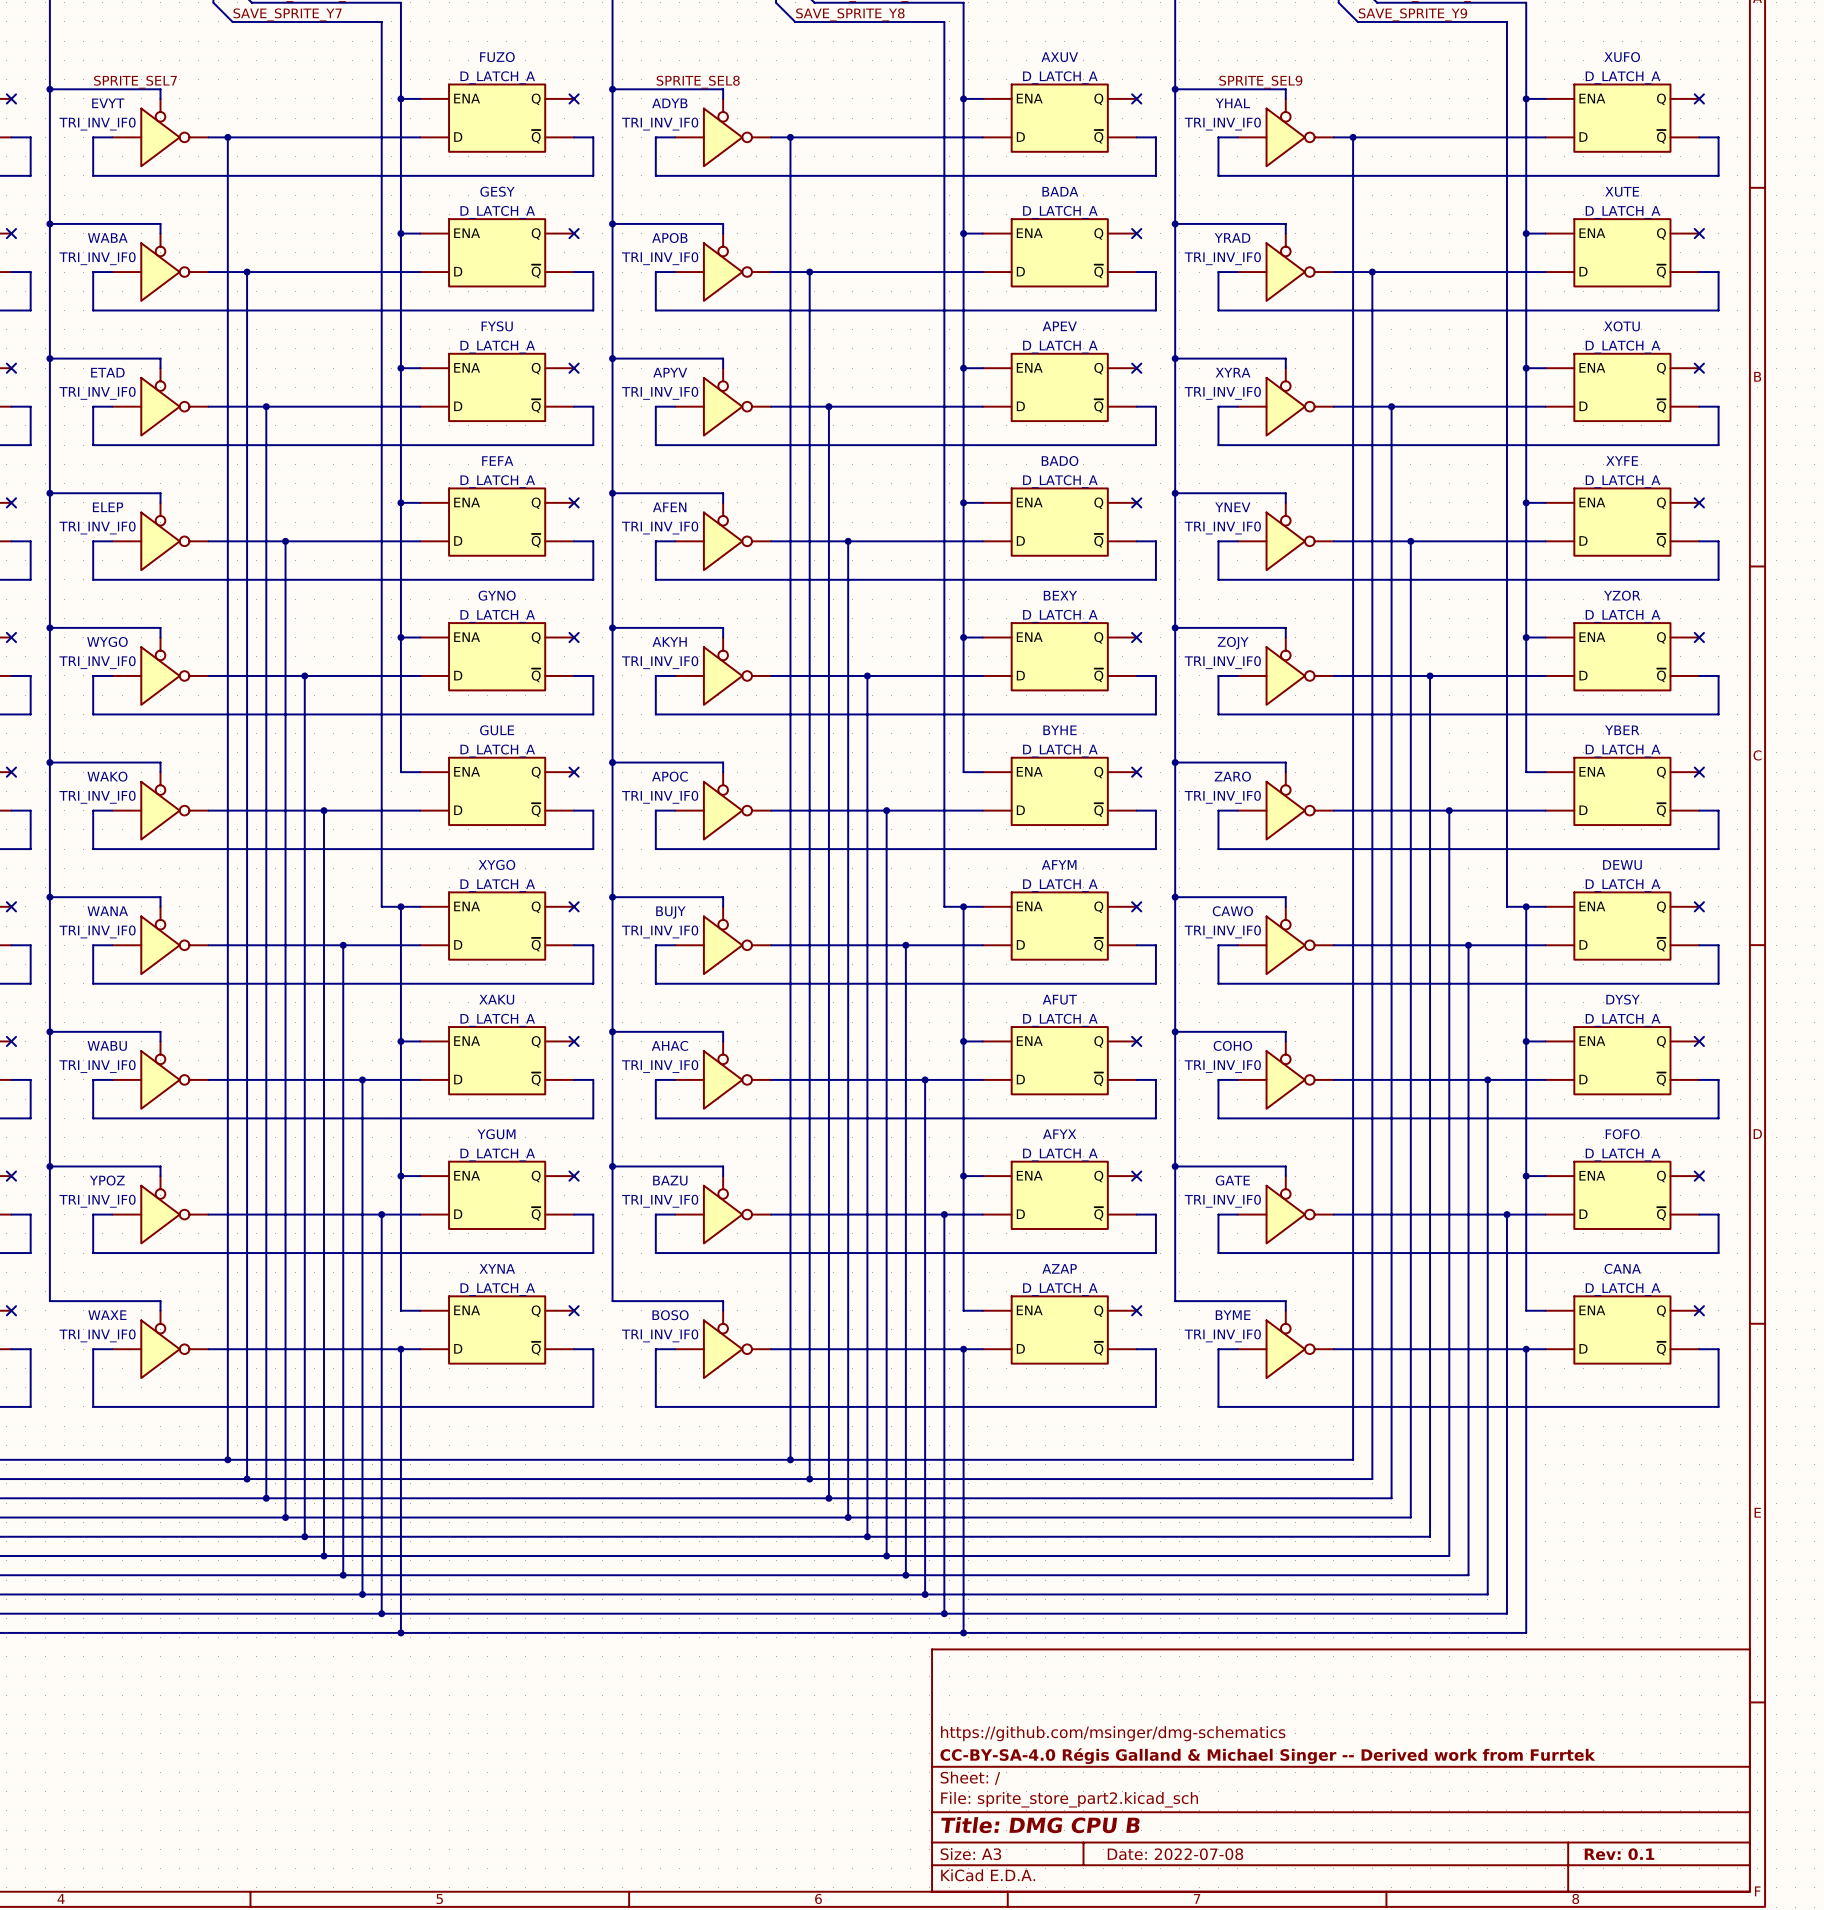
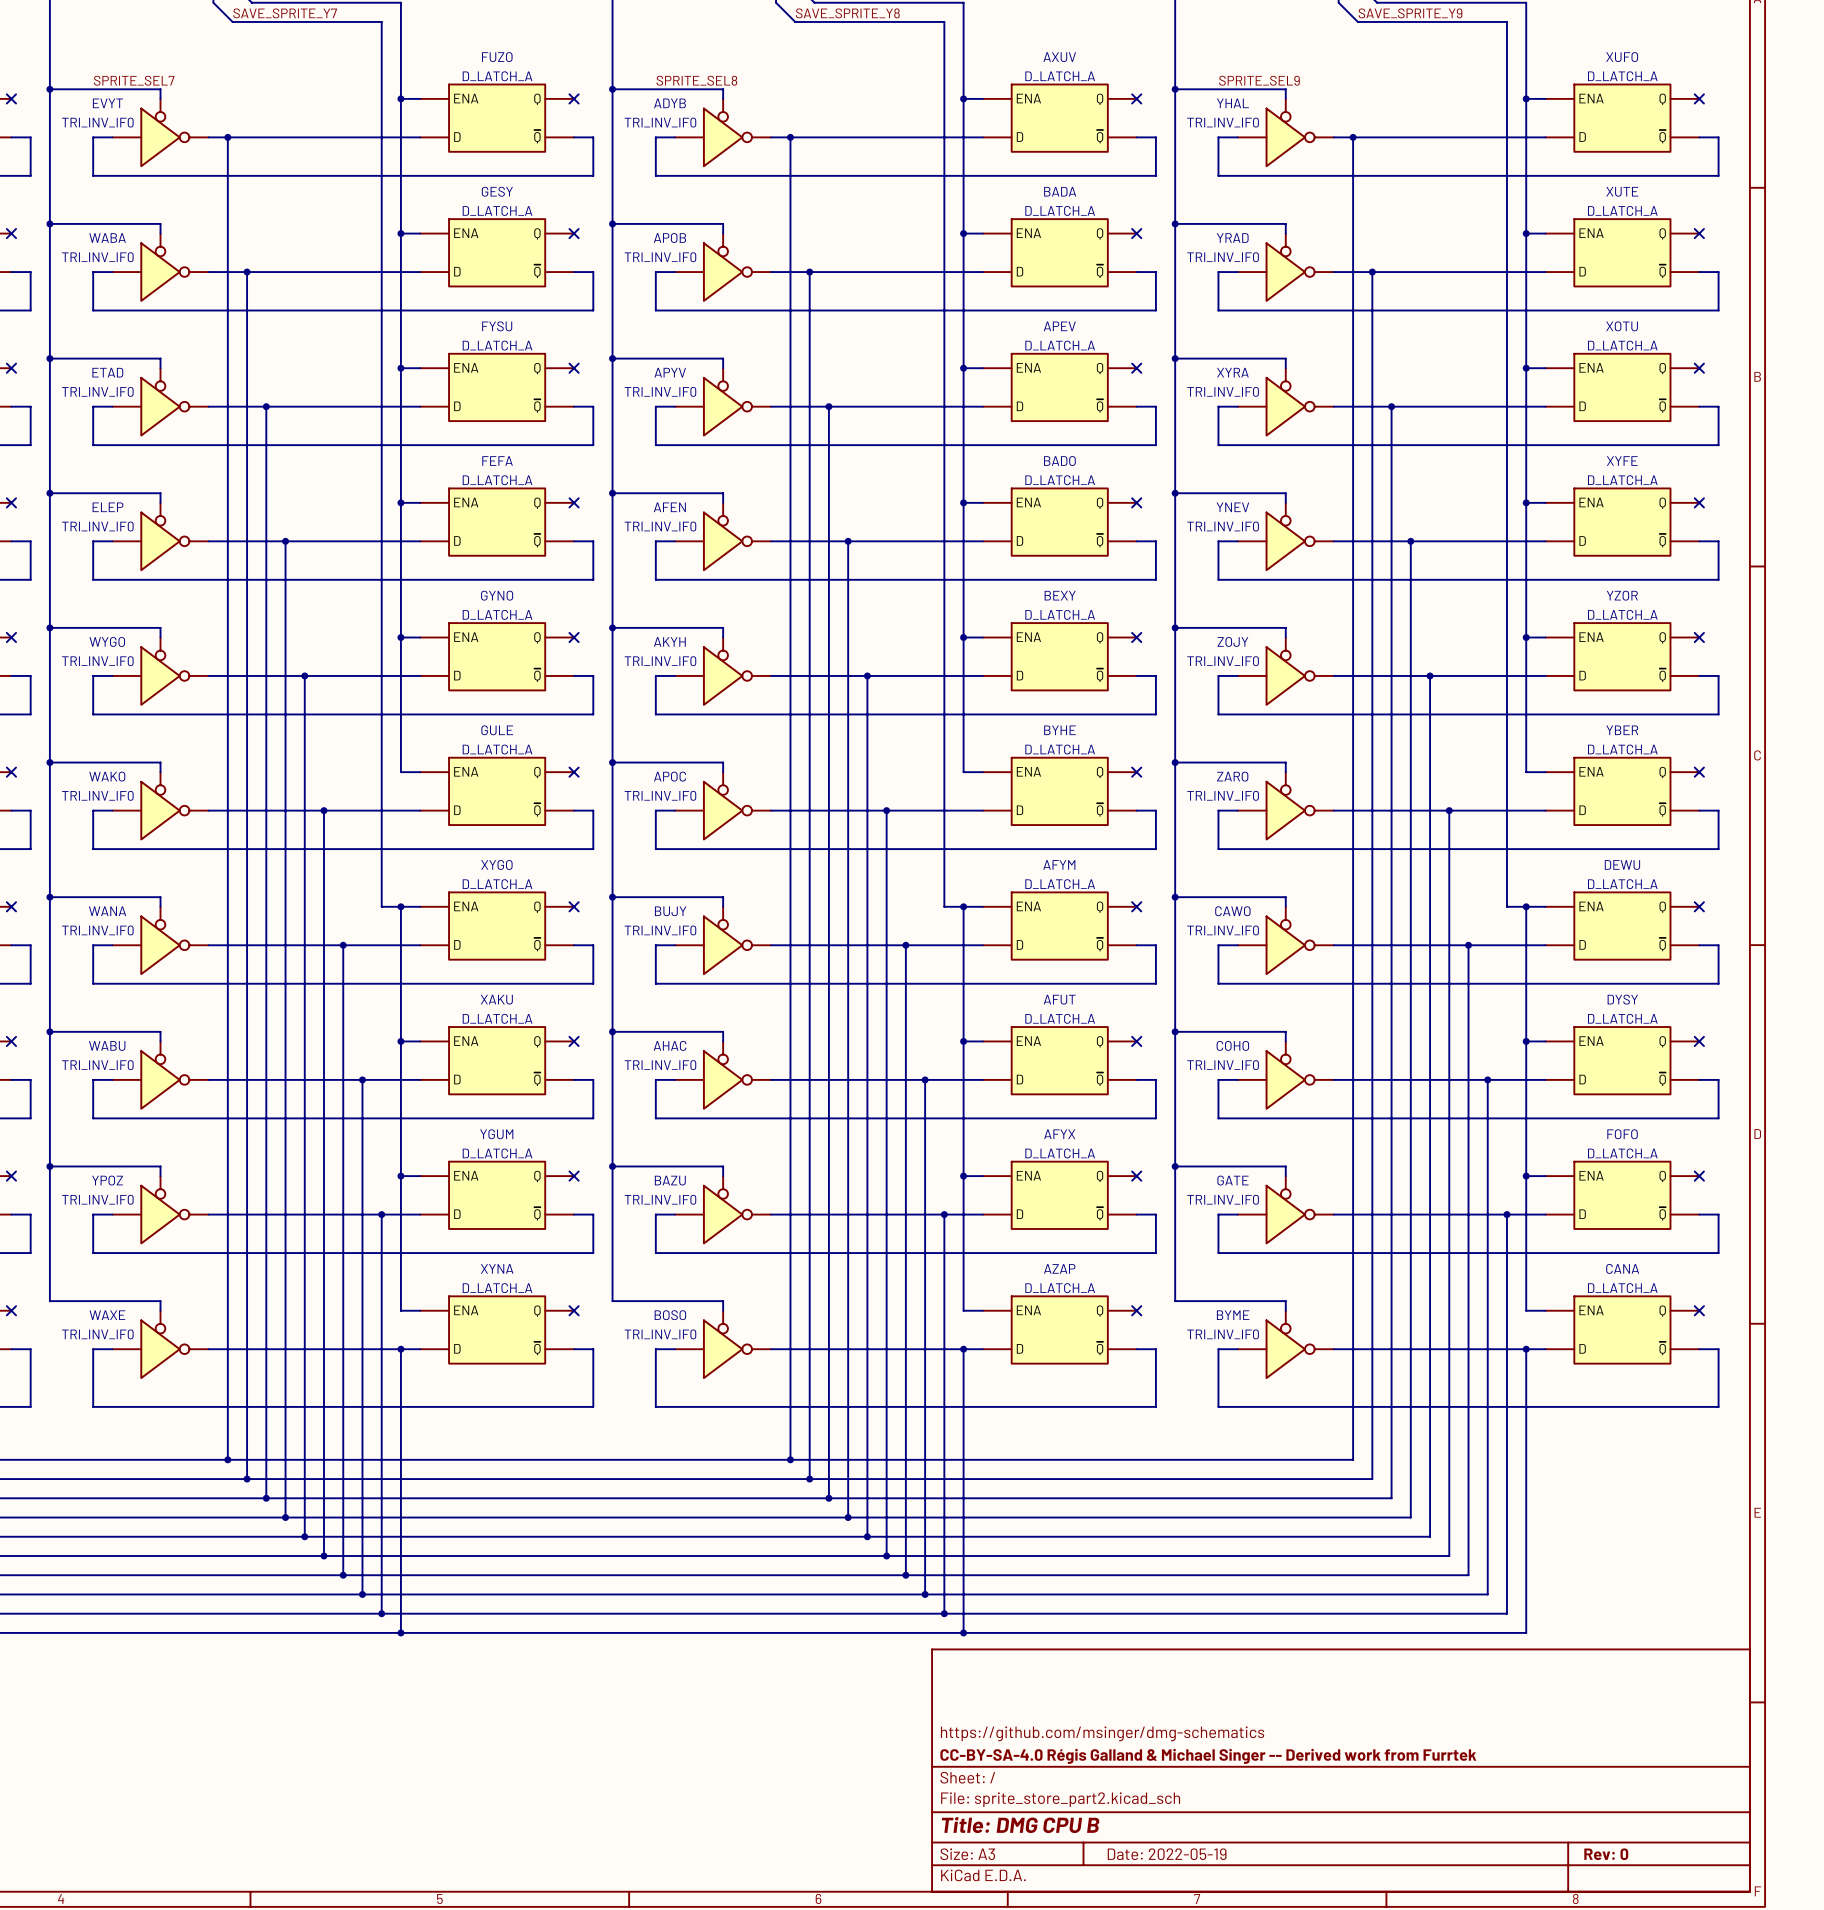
title block: Date: 2022-07-08 (1175, 1854) -> Date: 2022-05-19 (1167, 1854)
title block: Rev: 0.1 (1619, 1854) -> Rev: 0 (1606, 1854)

